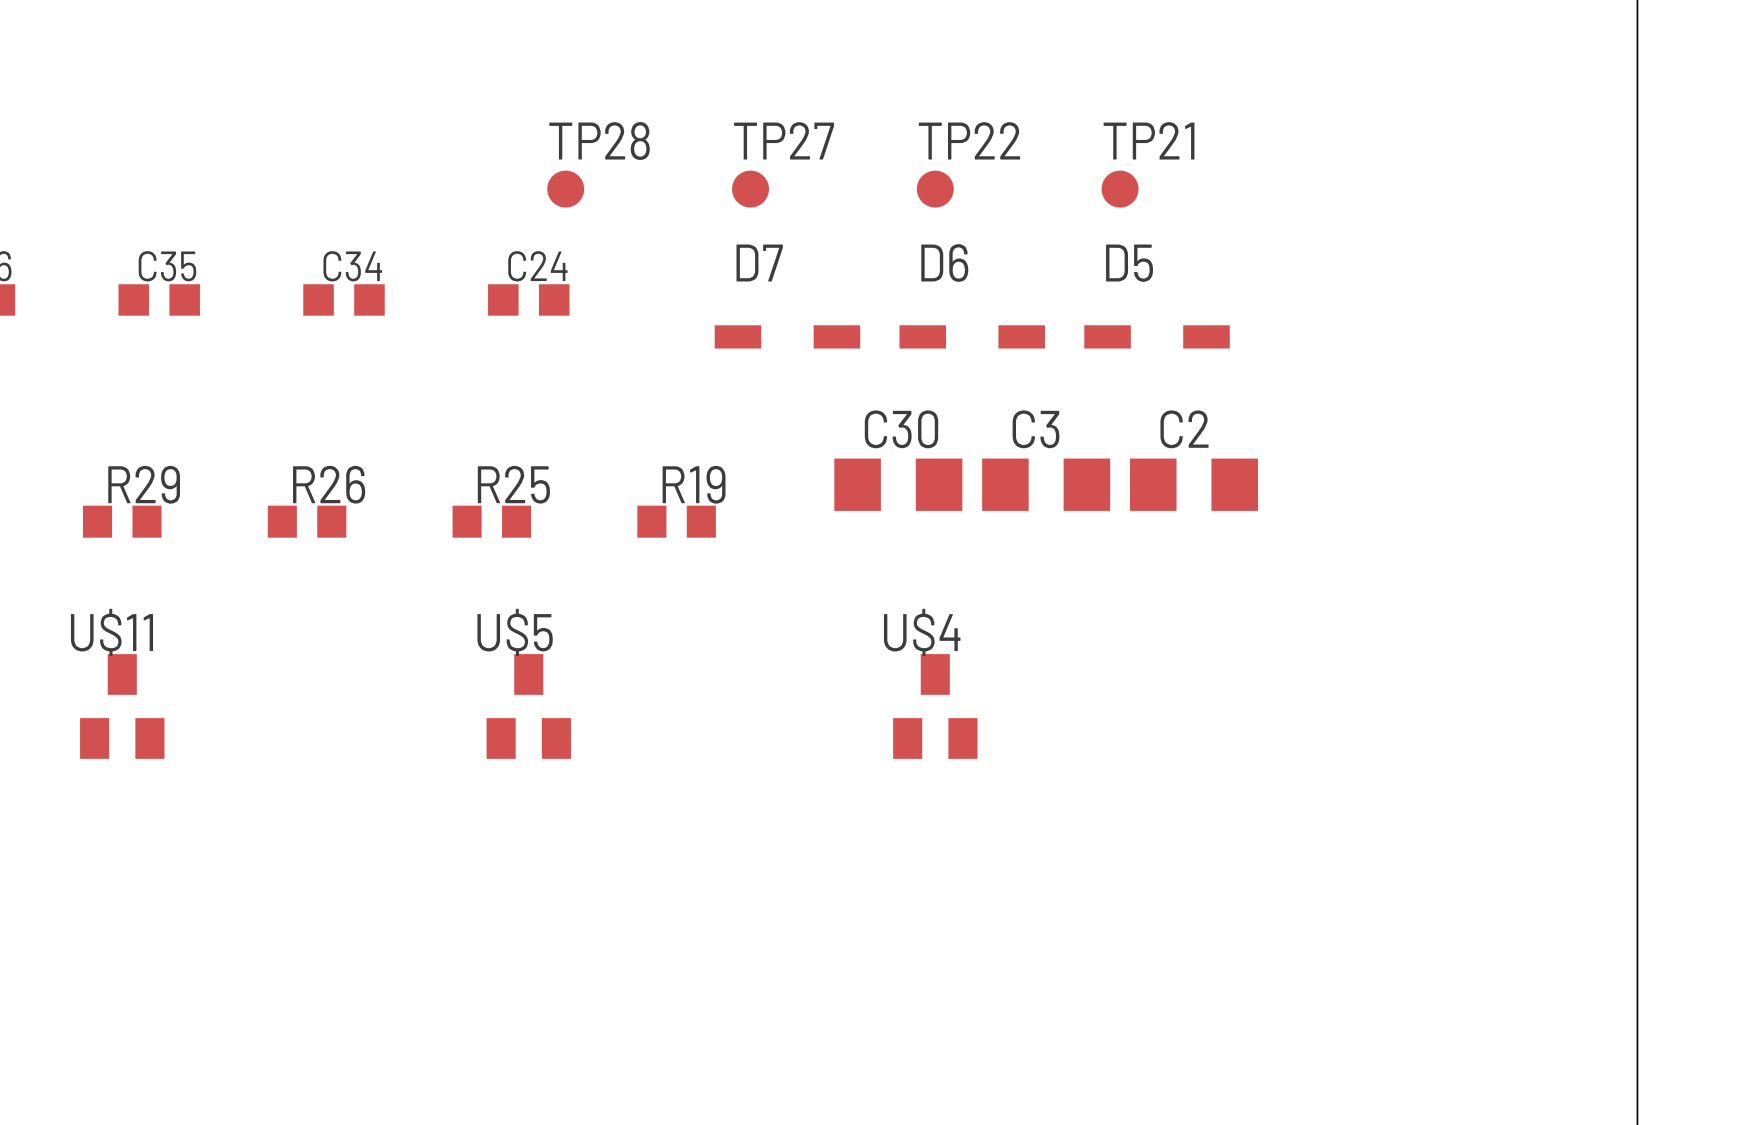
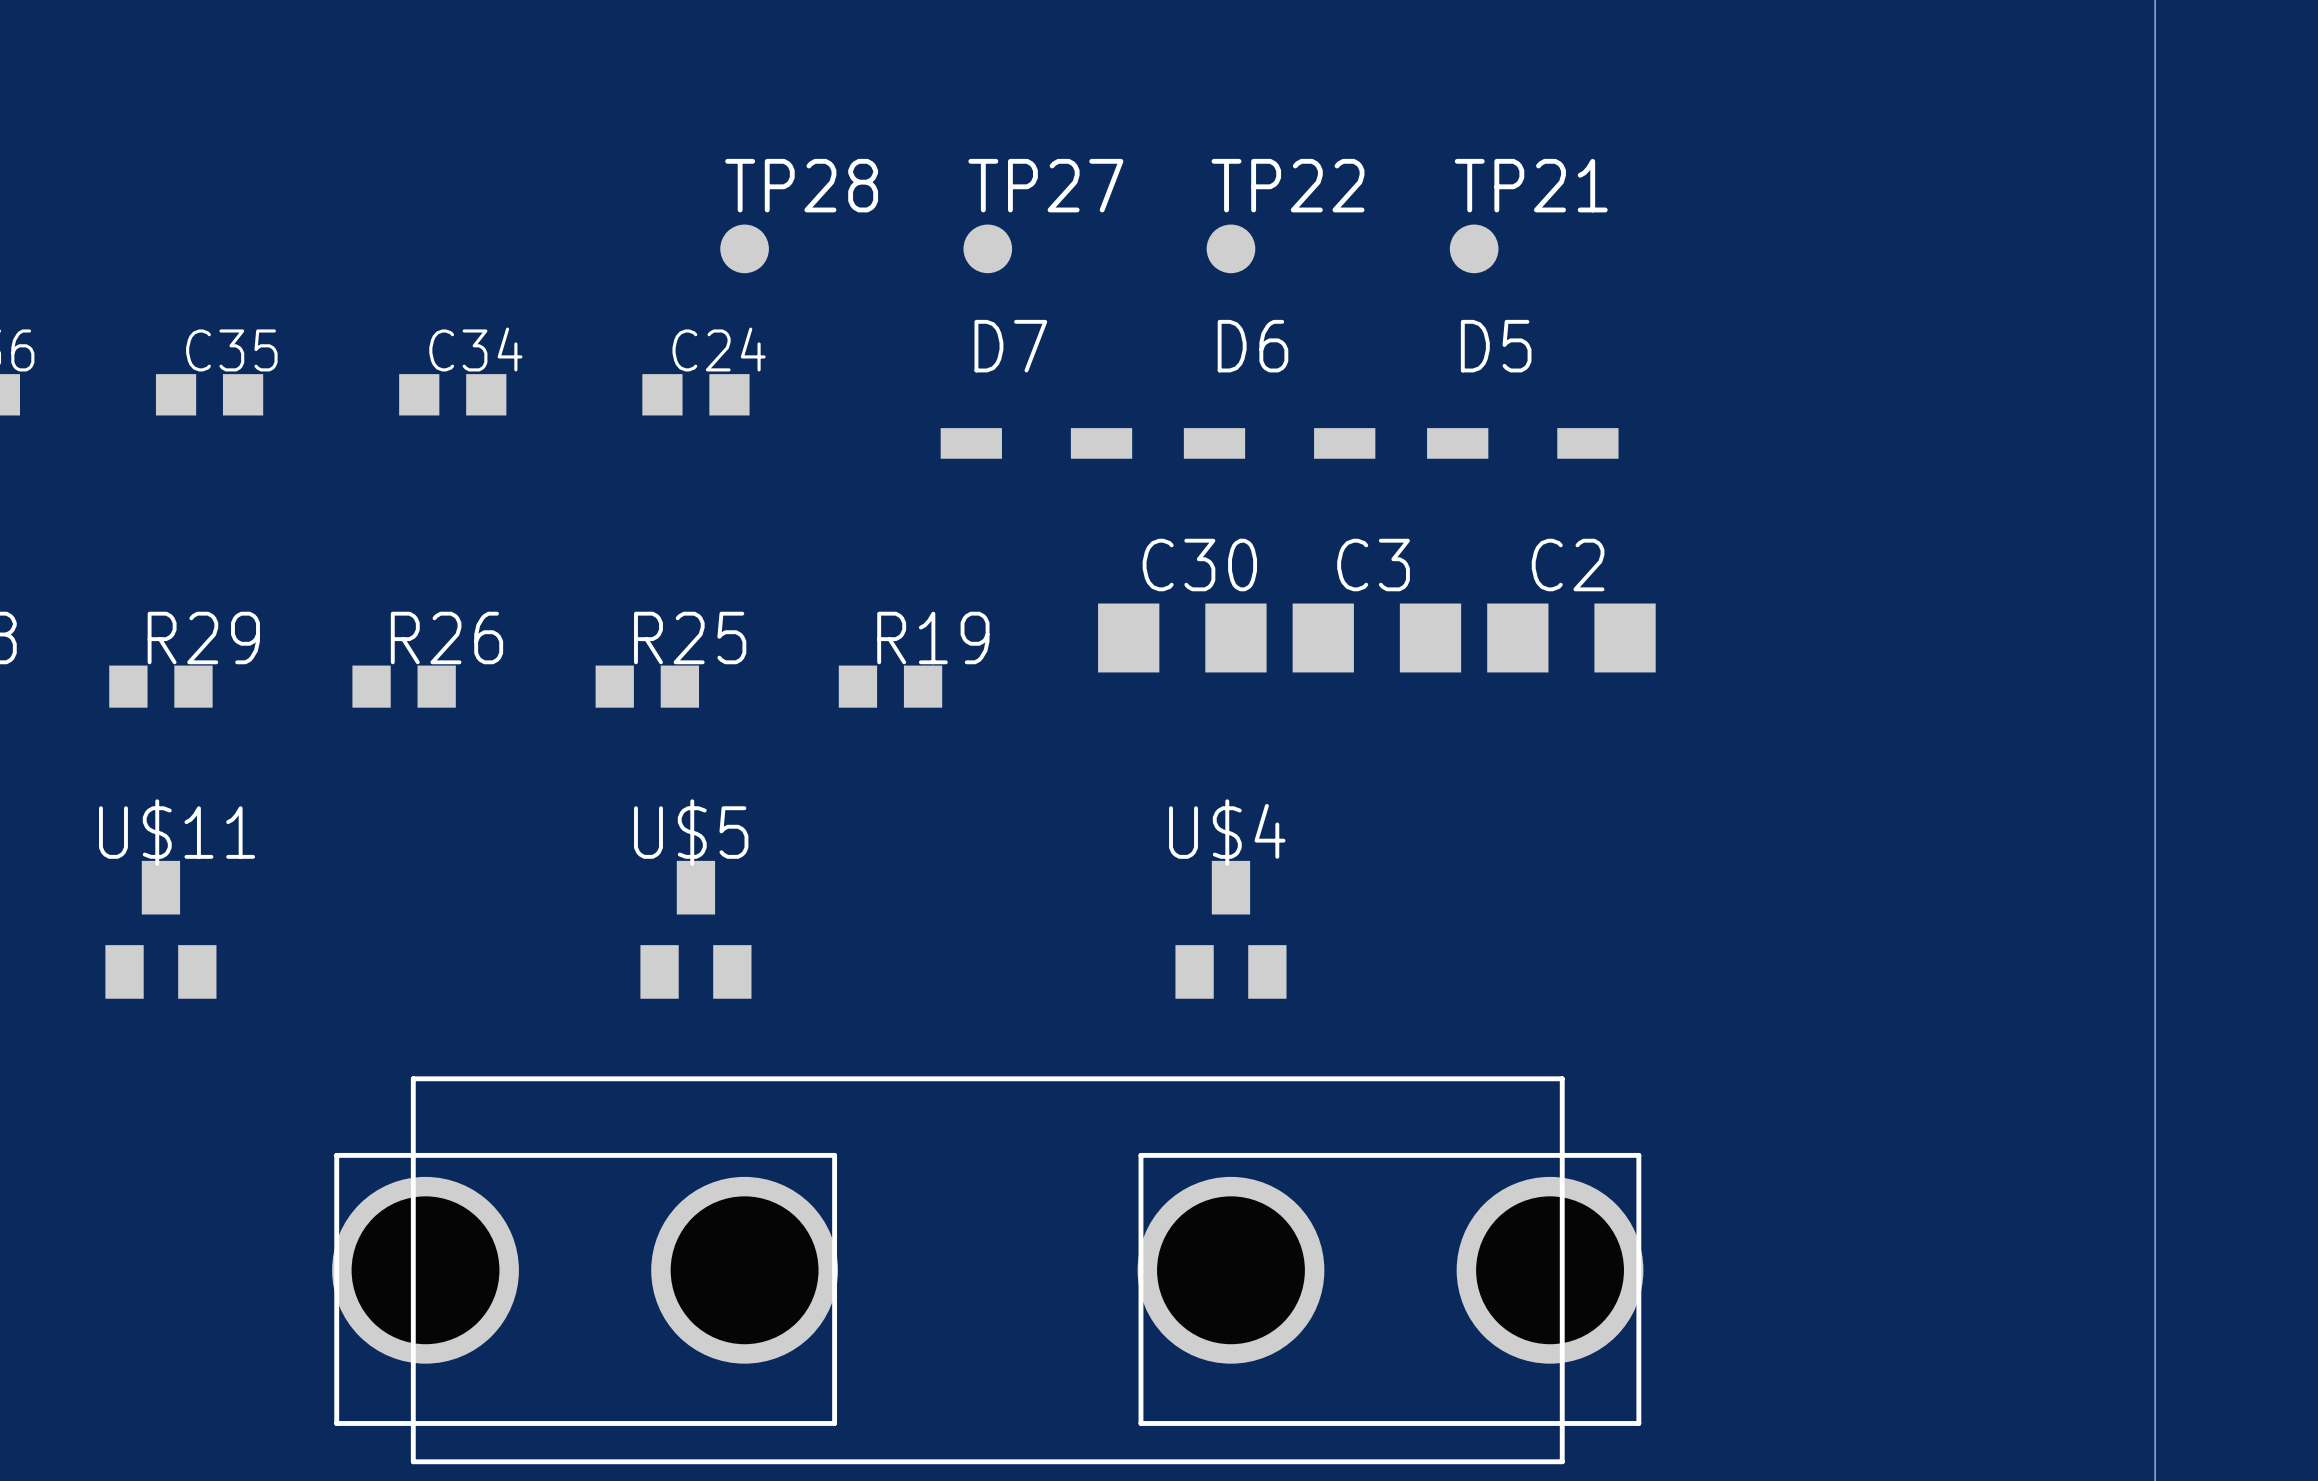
part: none -> (987, 1270)

